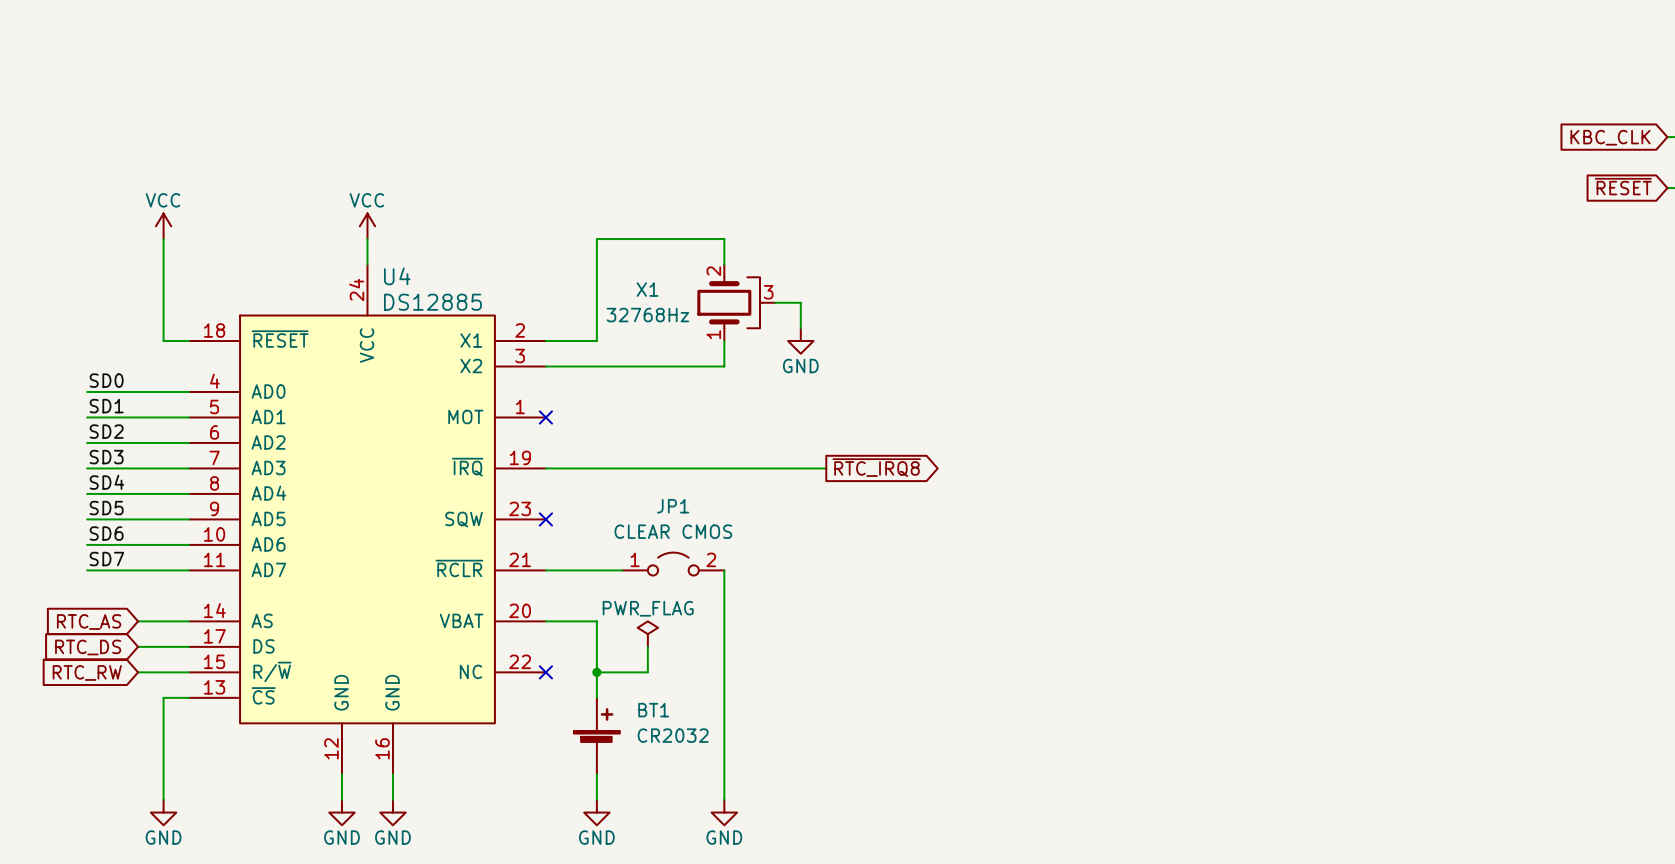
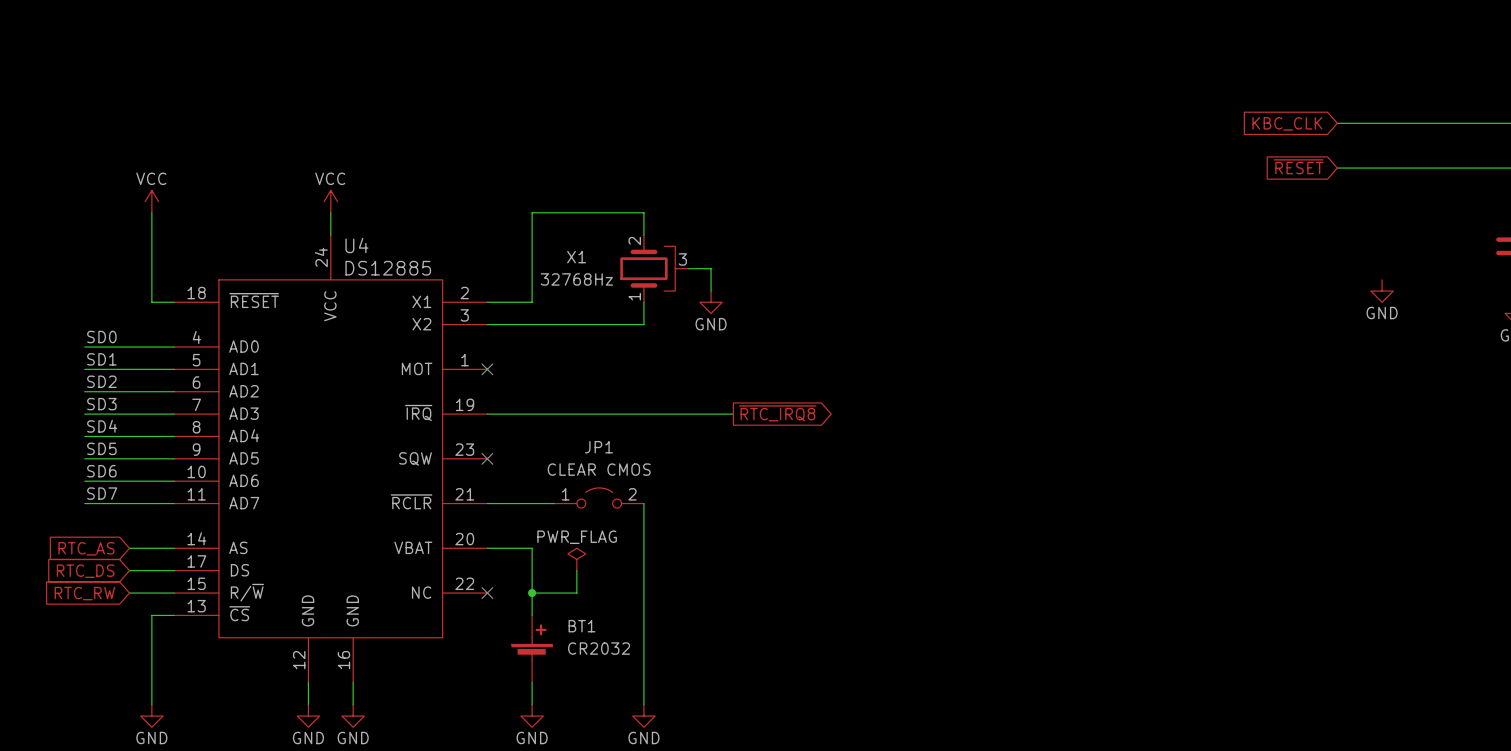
wire: none -> (1337, 123) (1471, 123)
global label position: KBC_CLK (1610, 137) -> KBC_CLK (1287, 123)
global label position: ~{RESET} (1623, 186) -> ~{RESET} (1298, 166)
wire: none -> (1337, 168) (1471, 168)
power symbol: none -> GND (1382, 291)

